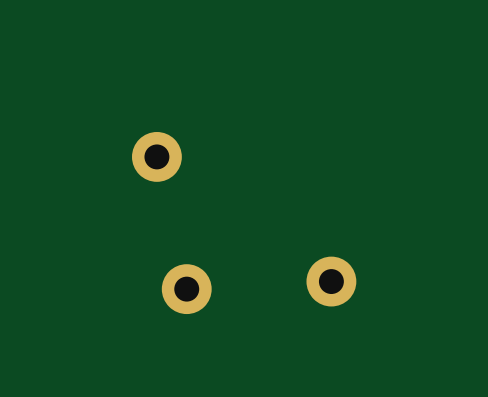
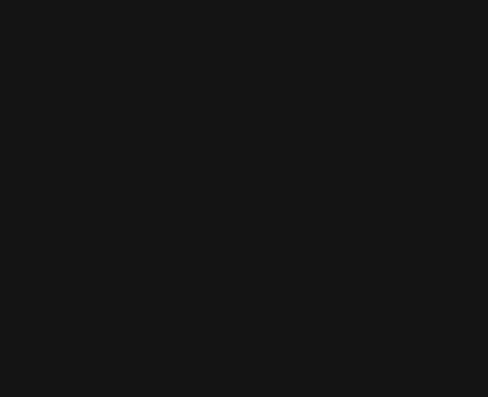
part: (156, 156) -> none
part: (331, 281) -> none
part: (186, 289) -> none

